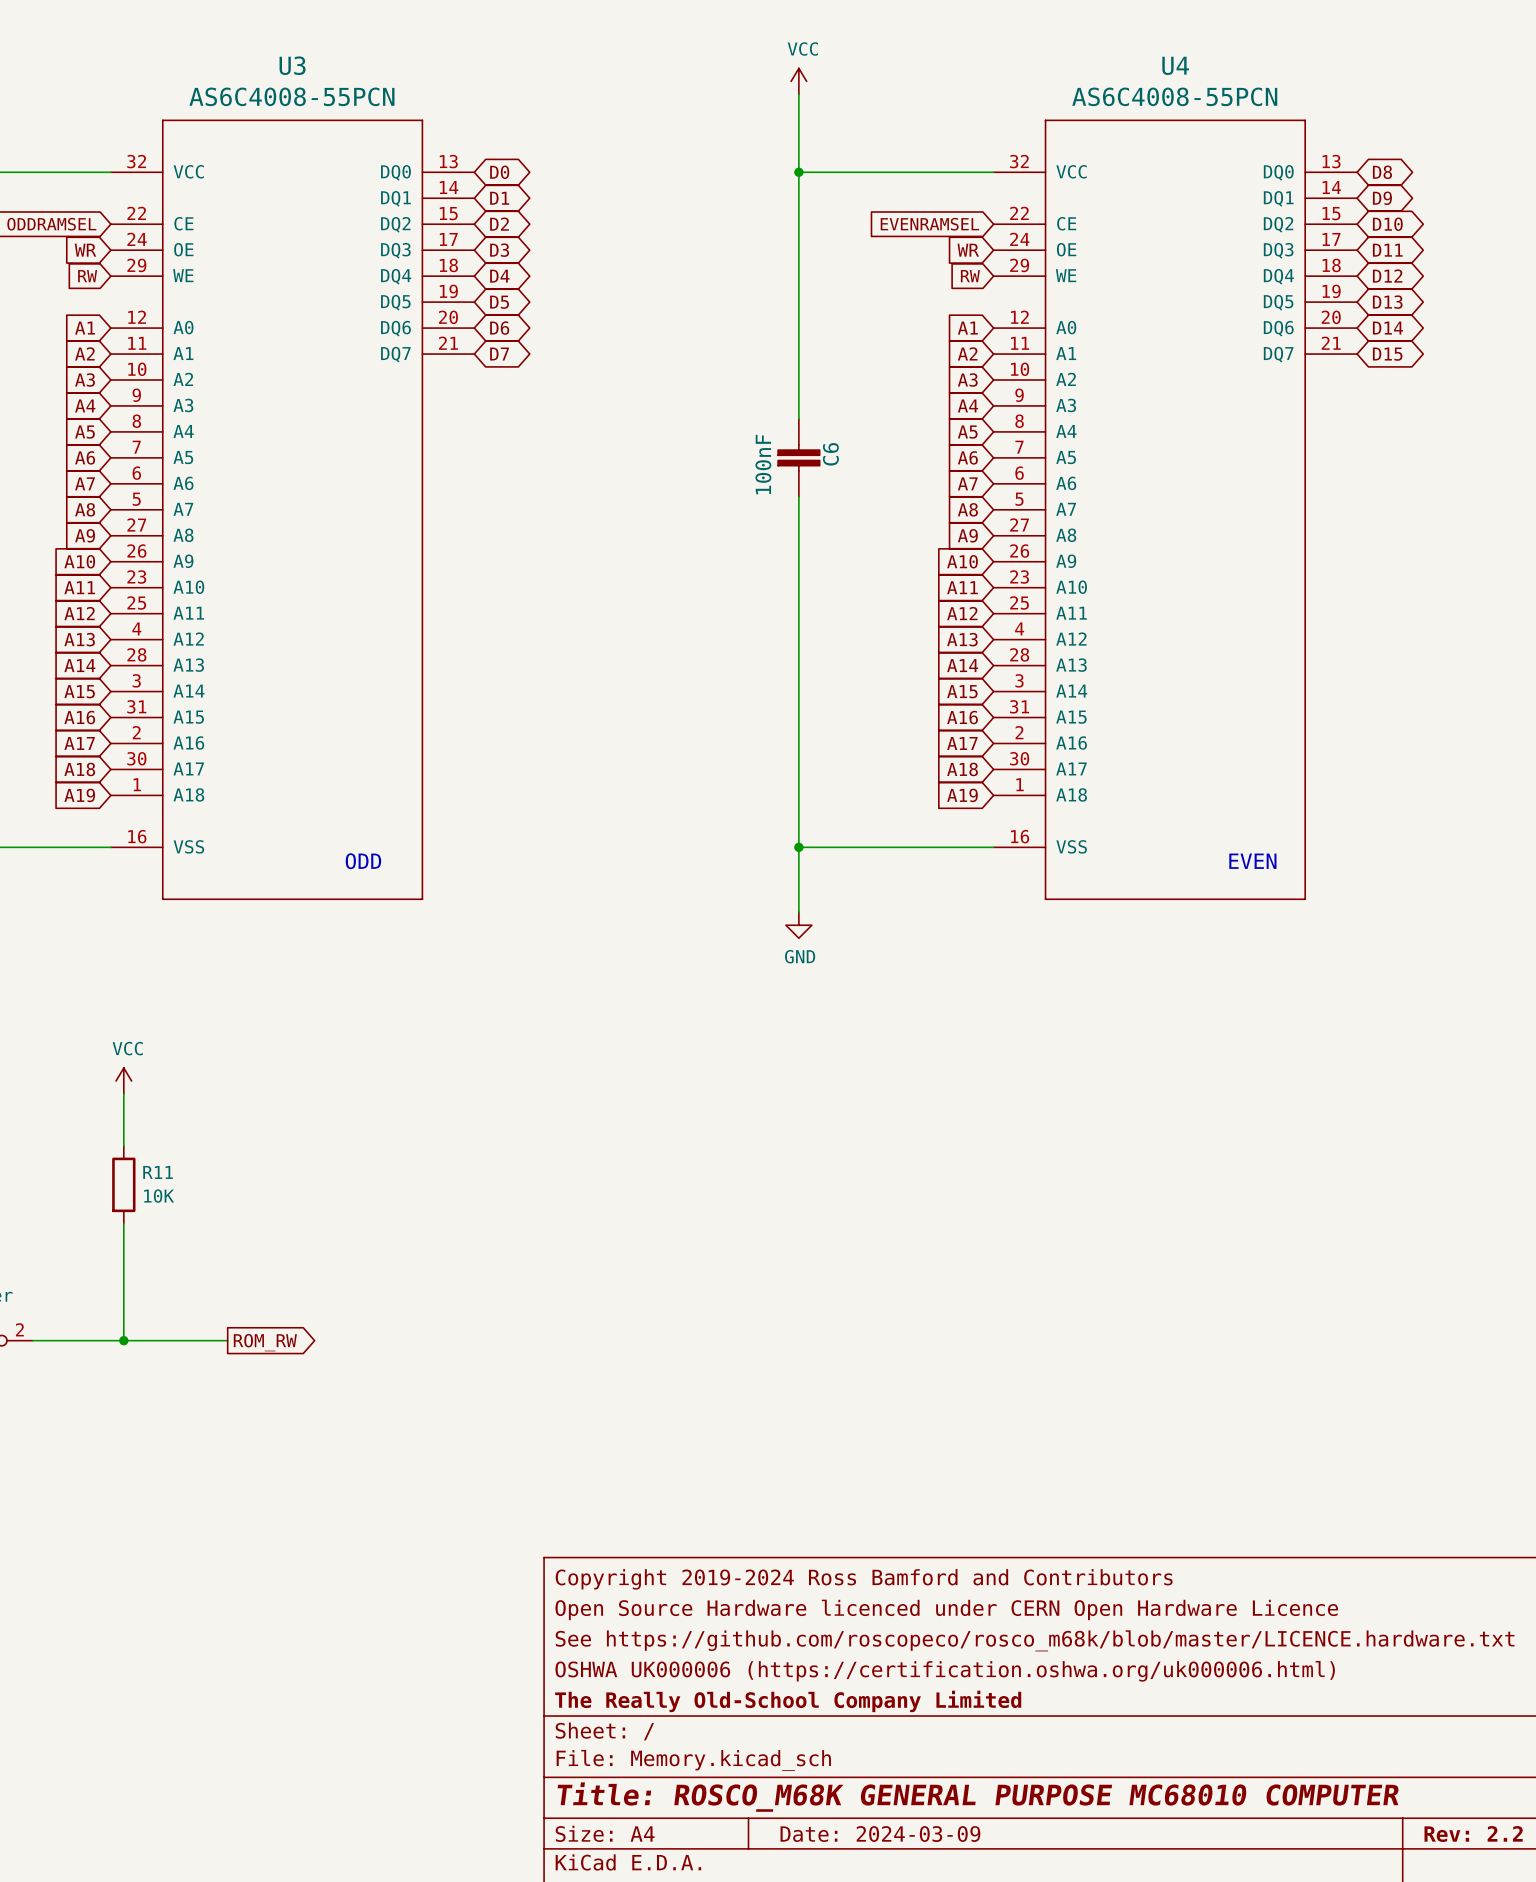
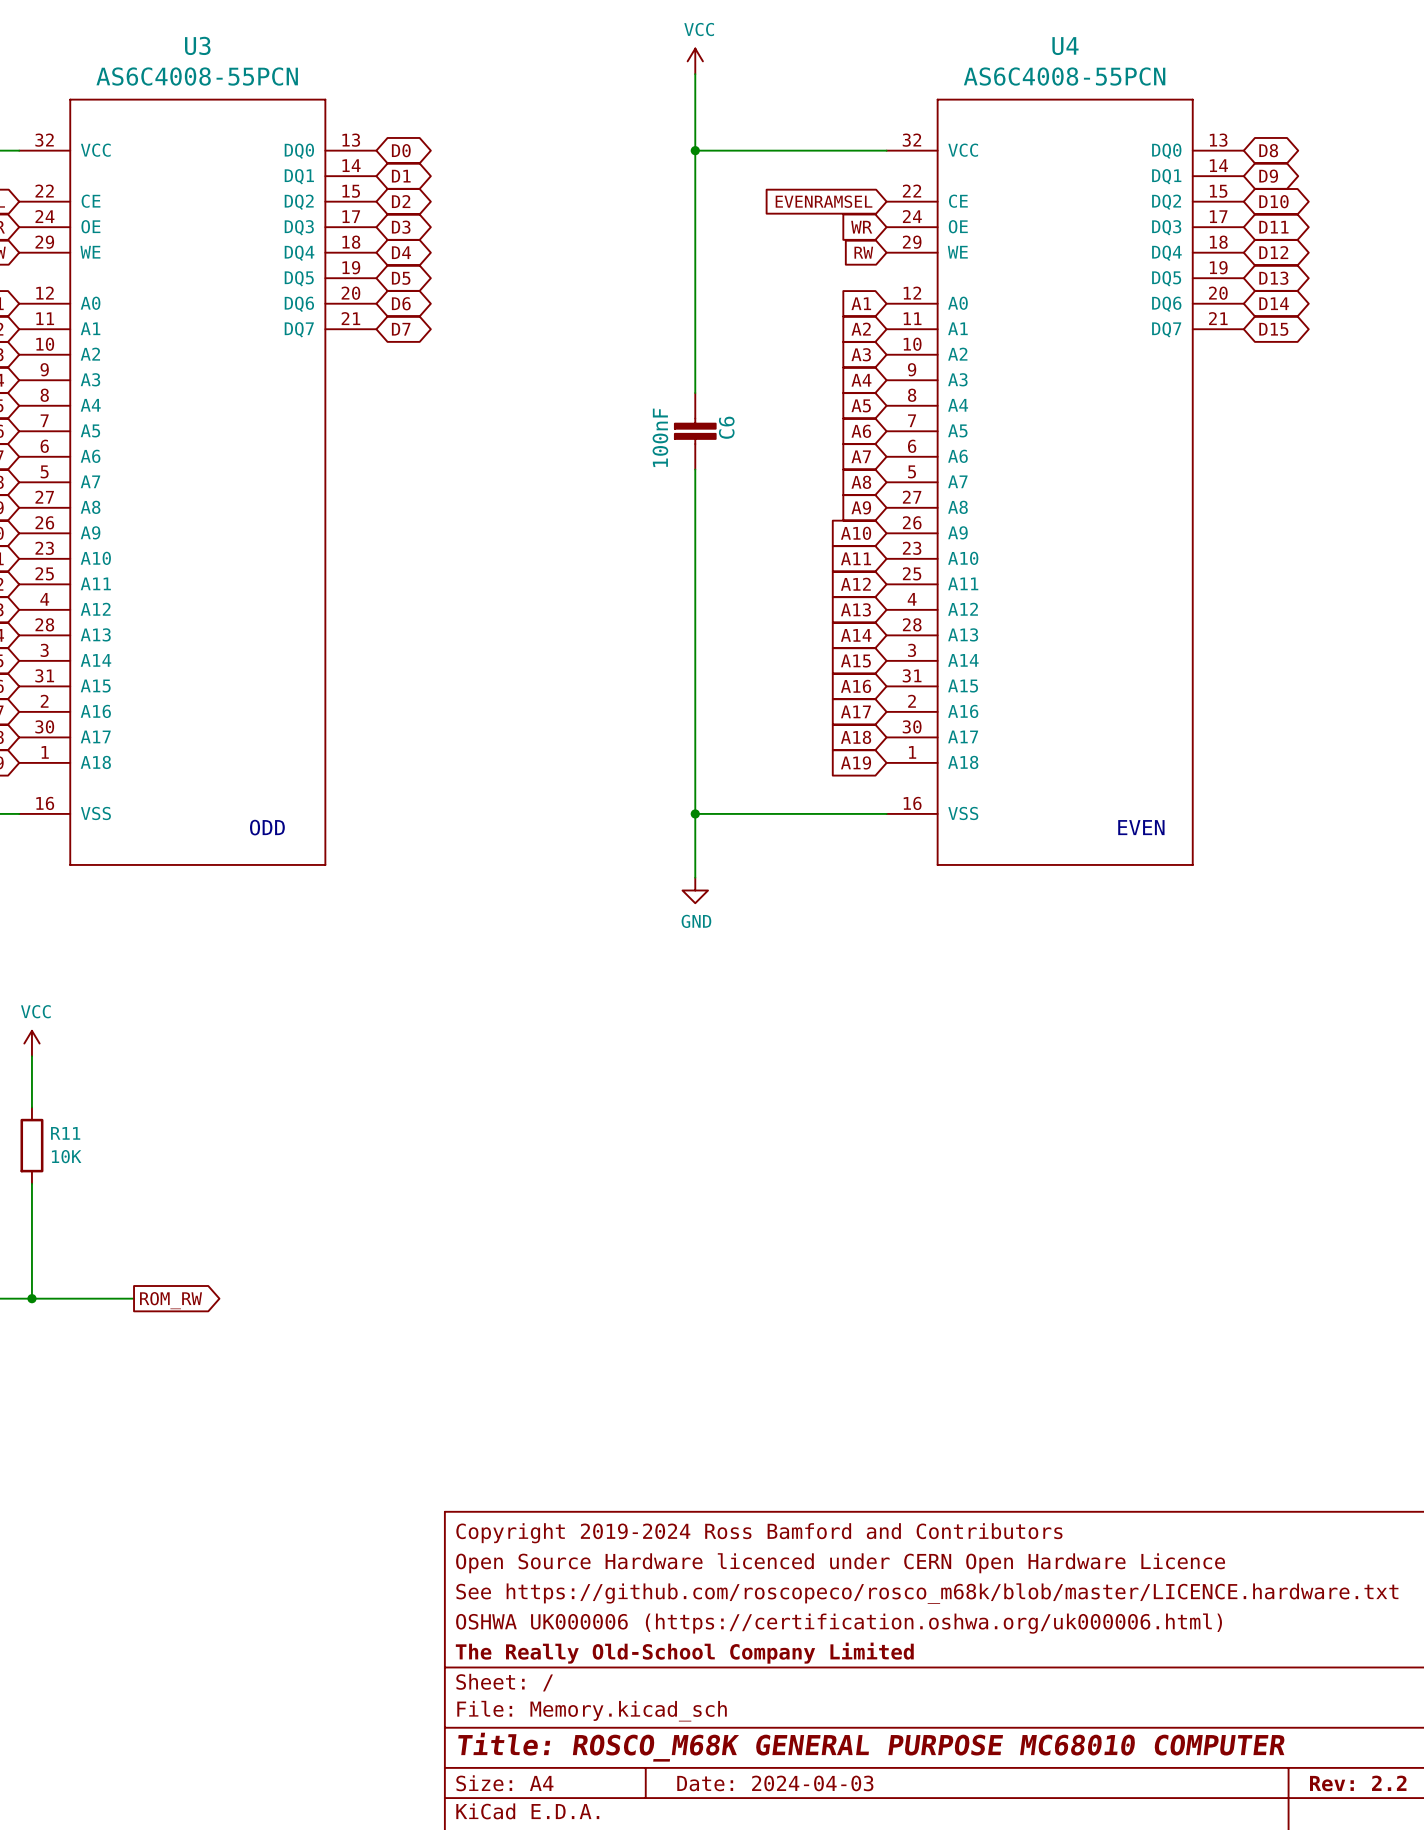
title block: Date: 2024-03-09 (880, 1834) -> Date: 2024-04-03 (775, 1783)

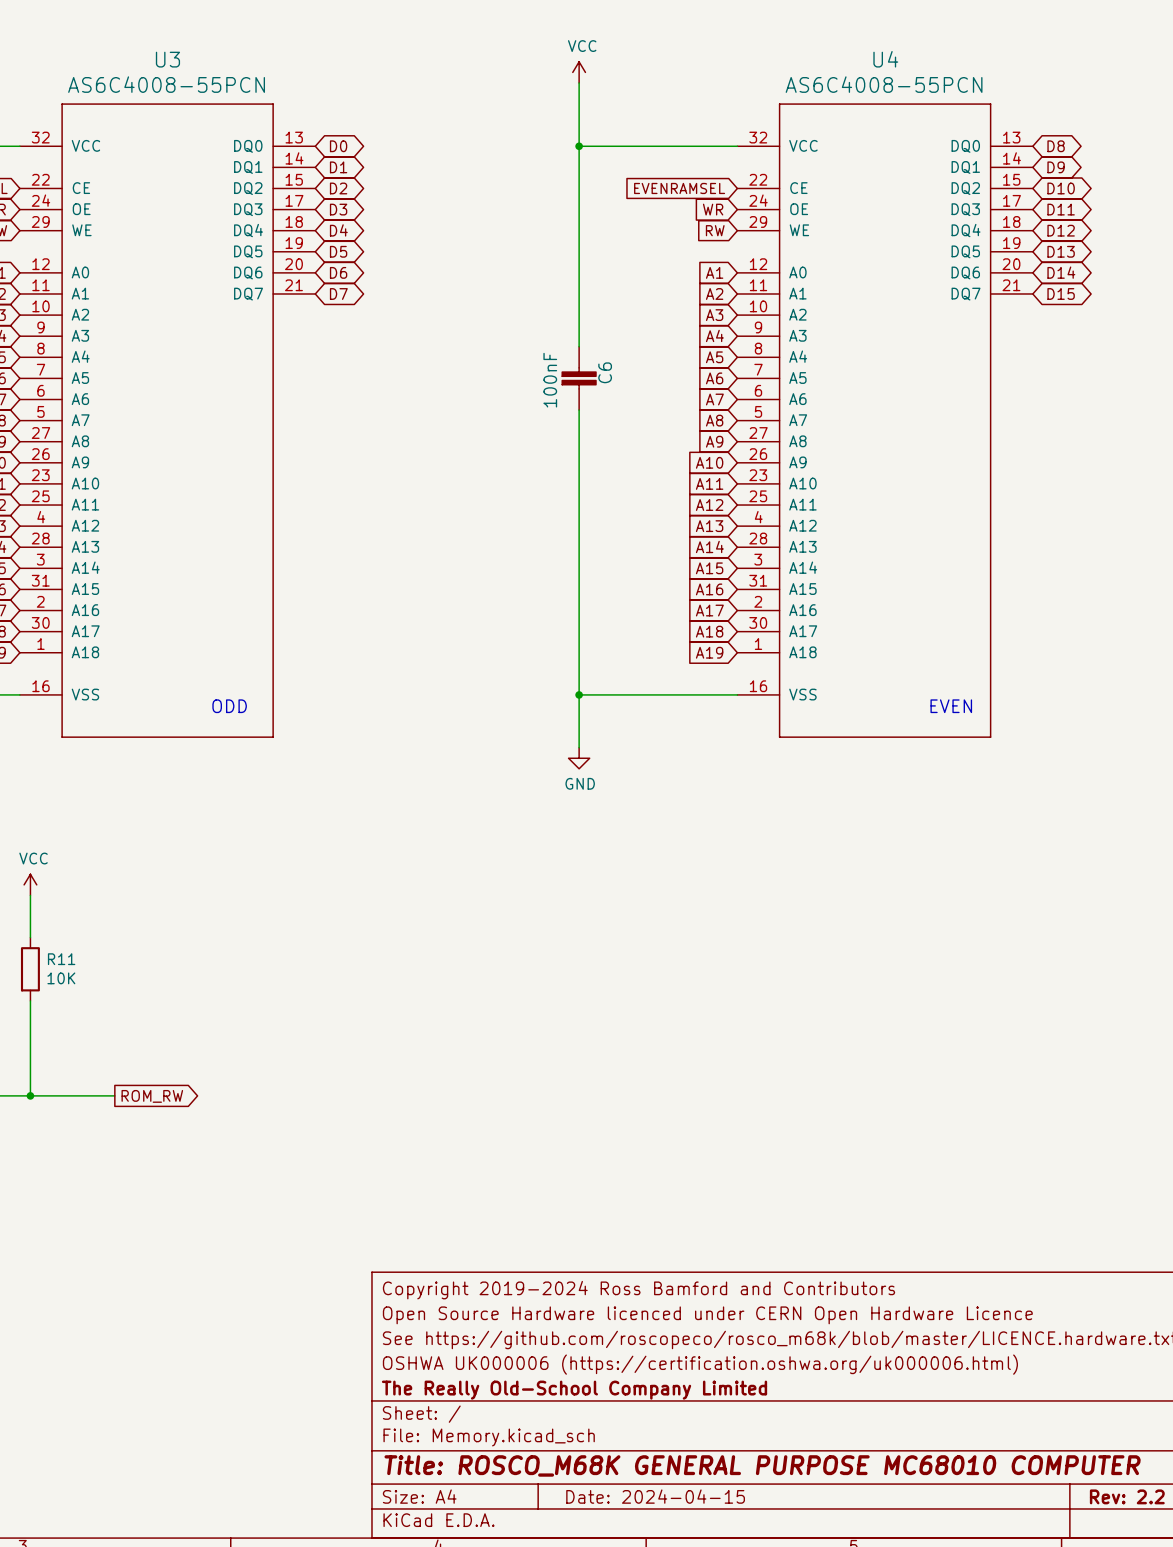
title block: Date: 2024-04-03 (775, 1783) -> Date: 2024-04-15 (655, 1496)

